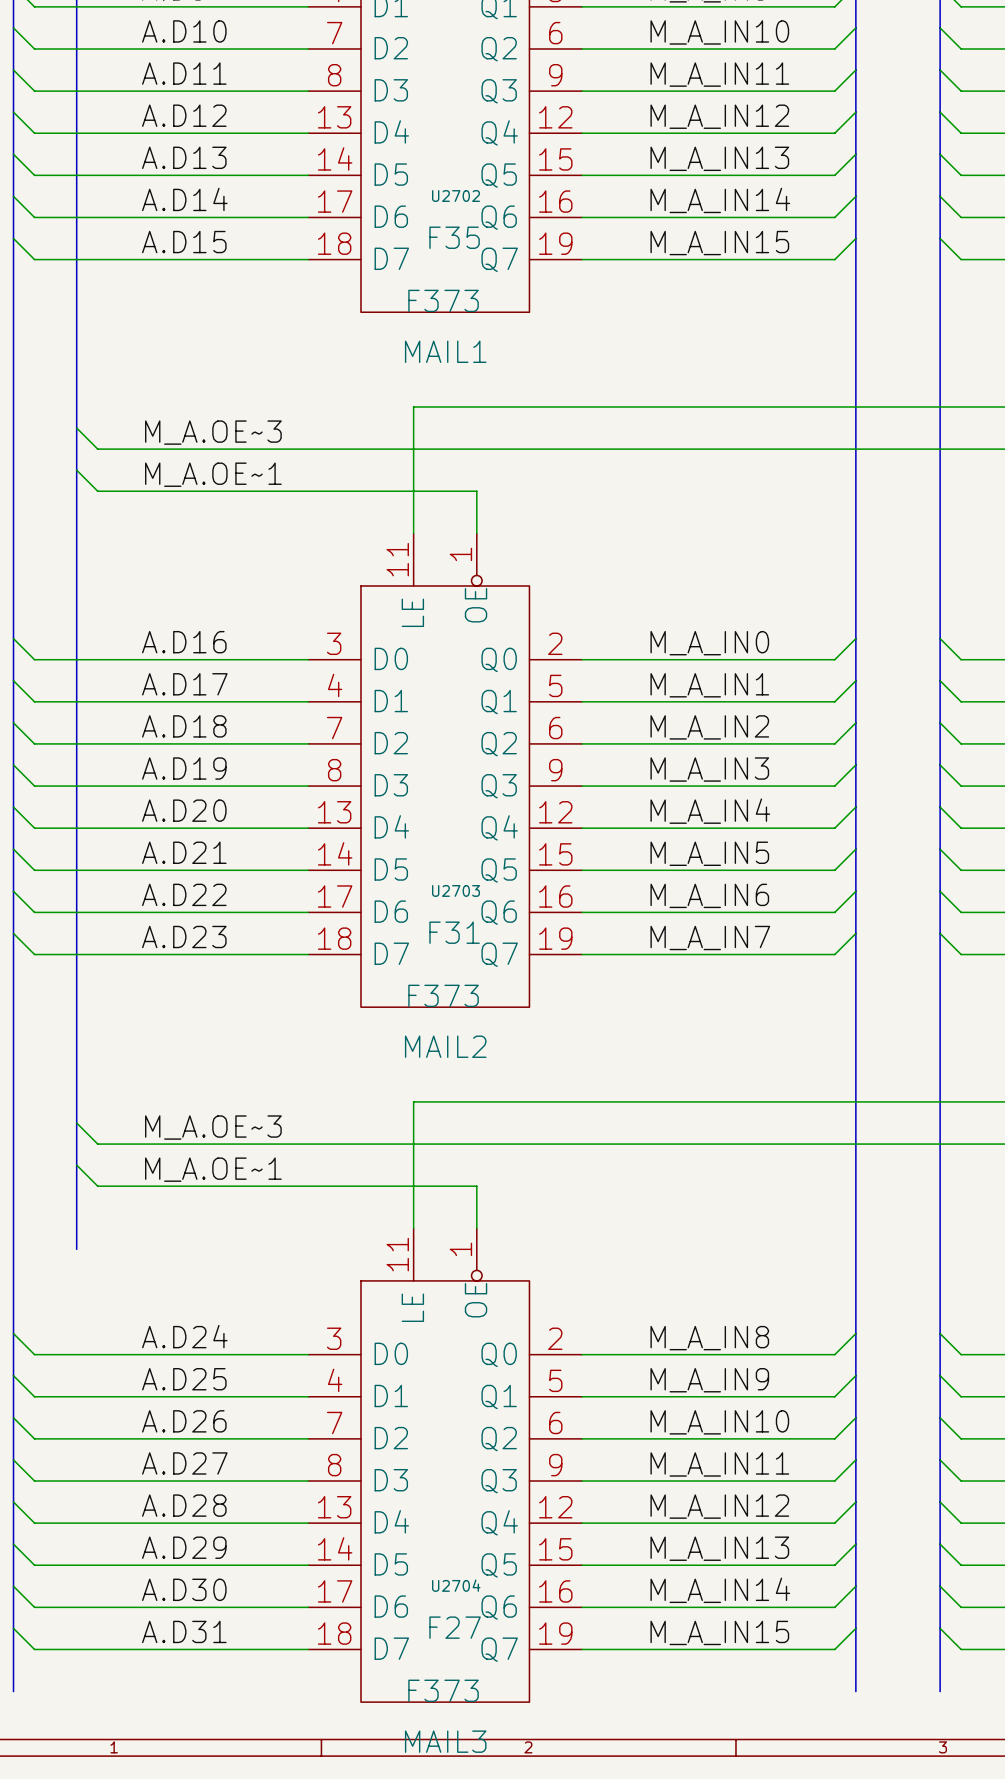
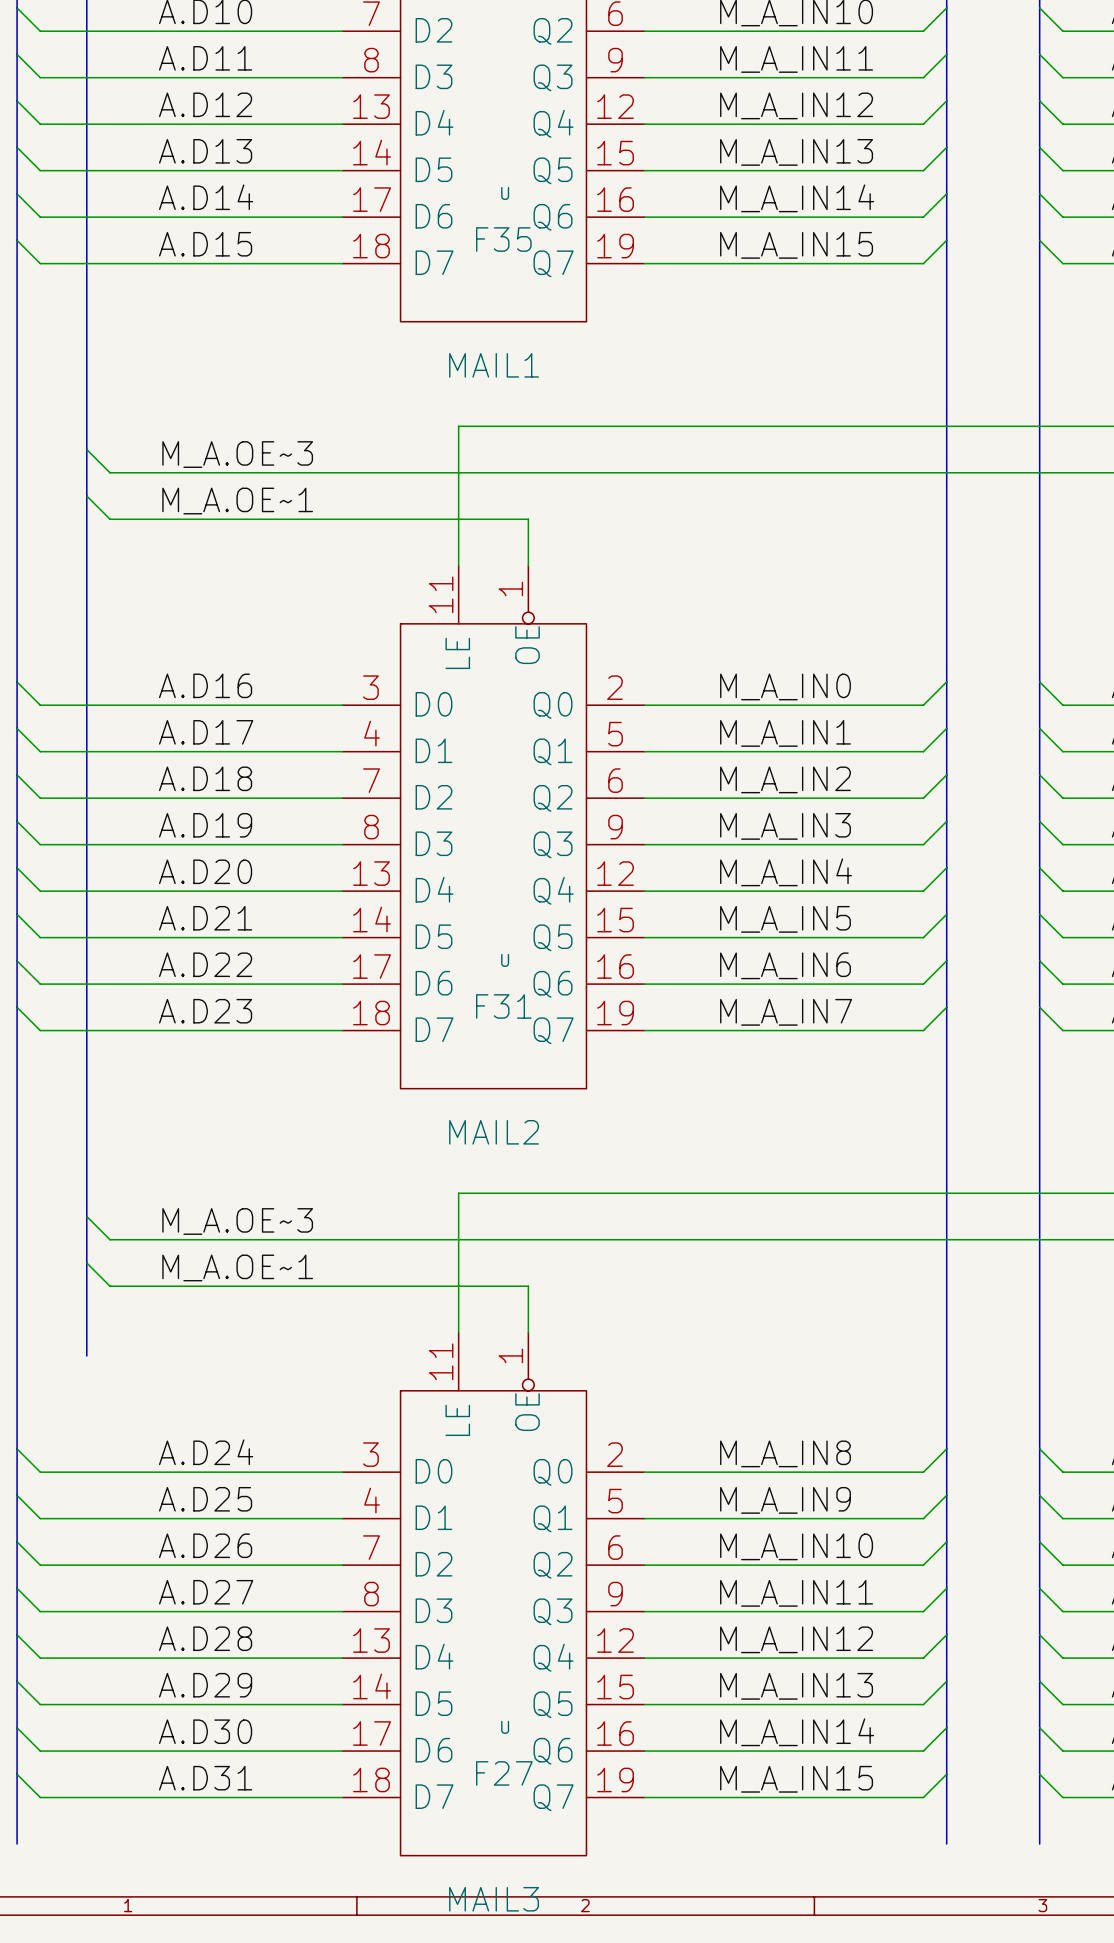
U2702 name: U2702 (456, 196) -> U (505, 193)
U2702 value: F373 (443, 300) -> none
U2703 name: U2703 (456, 890) -> U (505, 960)
U2703 value: F373 (443, 995) -> none
U2704 name: U2704 (456, 1585) -> U (505, 1727)
U2704 value: F373 (443, 1690) -> none

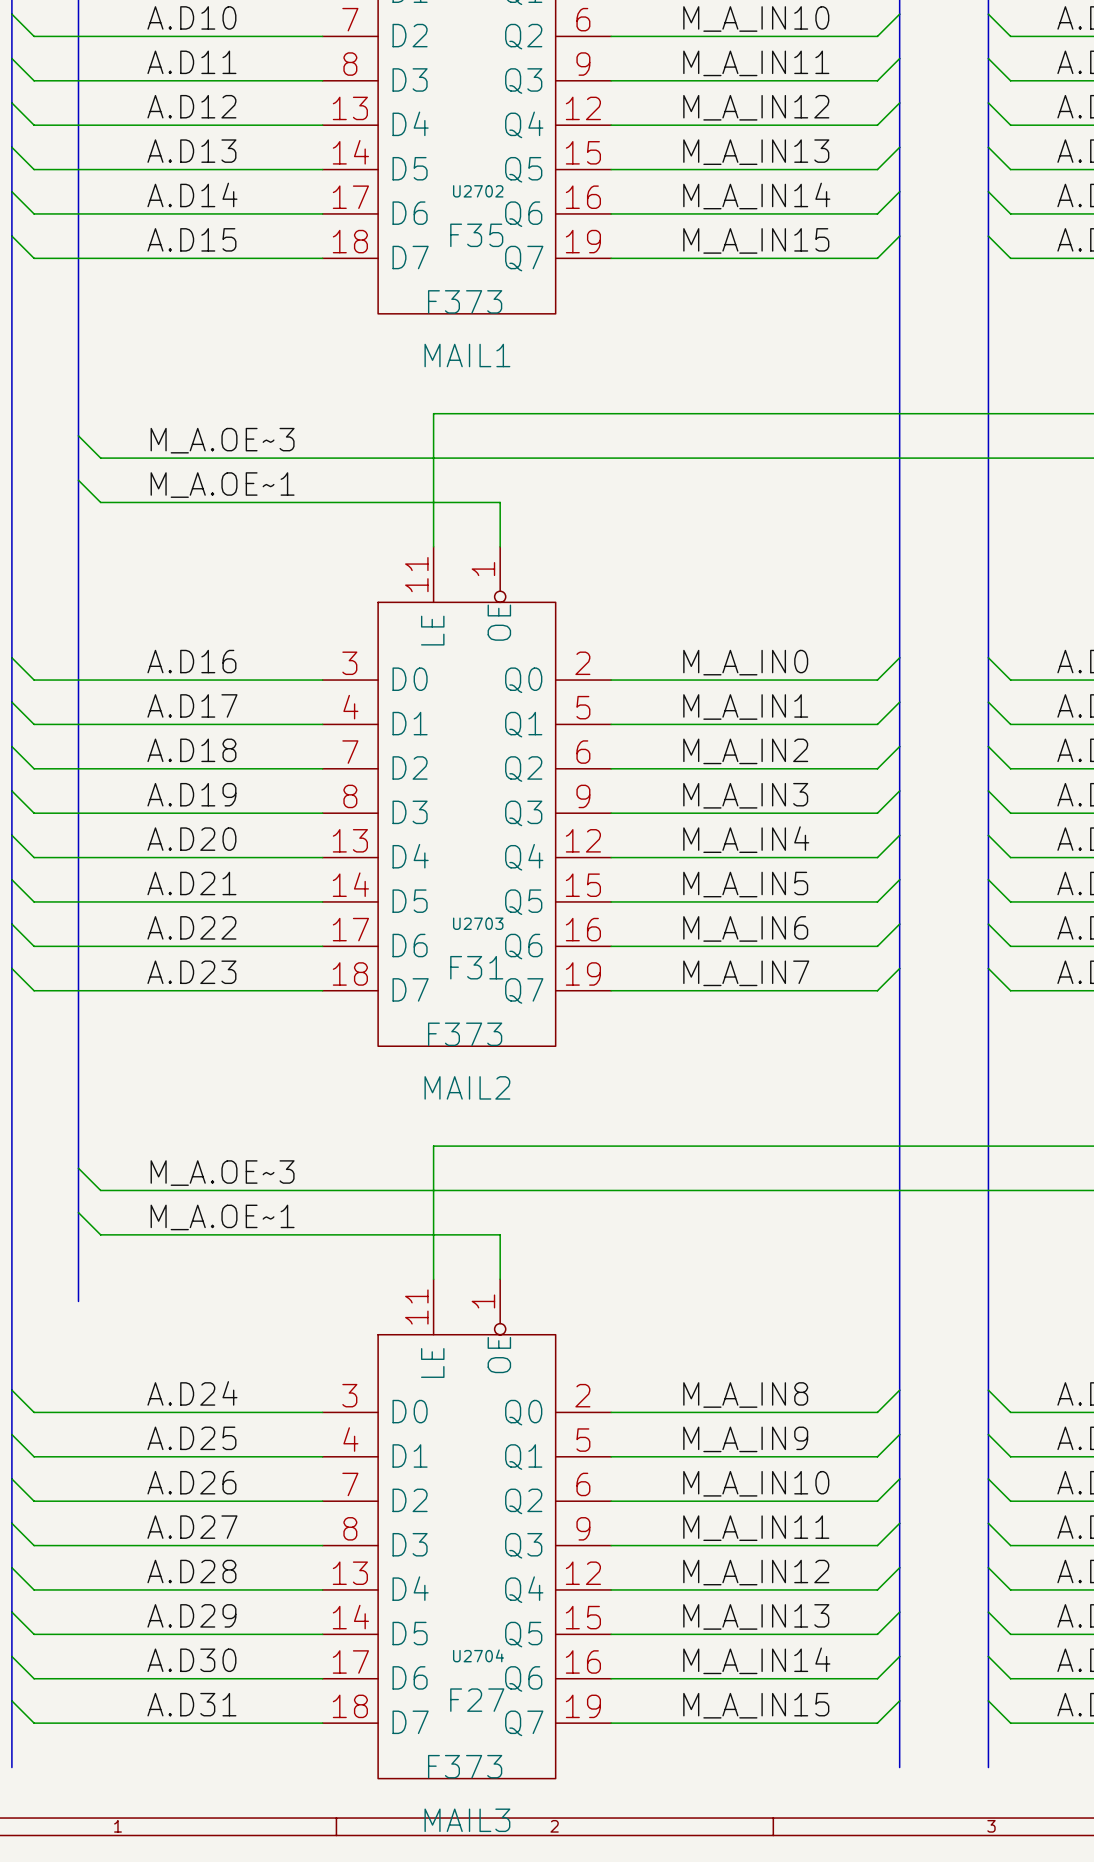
U name: U (505, 193) -> U2702 (478, 191)
U value: none -> F373 (465, 301)
U name: U (505, 960) -> U2703 (478, 923)
U value: none -> F373 (465, 1034)
U name: U (505, 1727) -> U2704 (478, 1655)
U value: none -> F373 (465, 1766)

